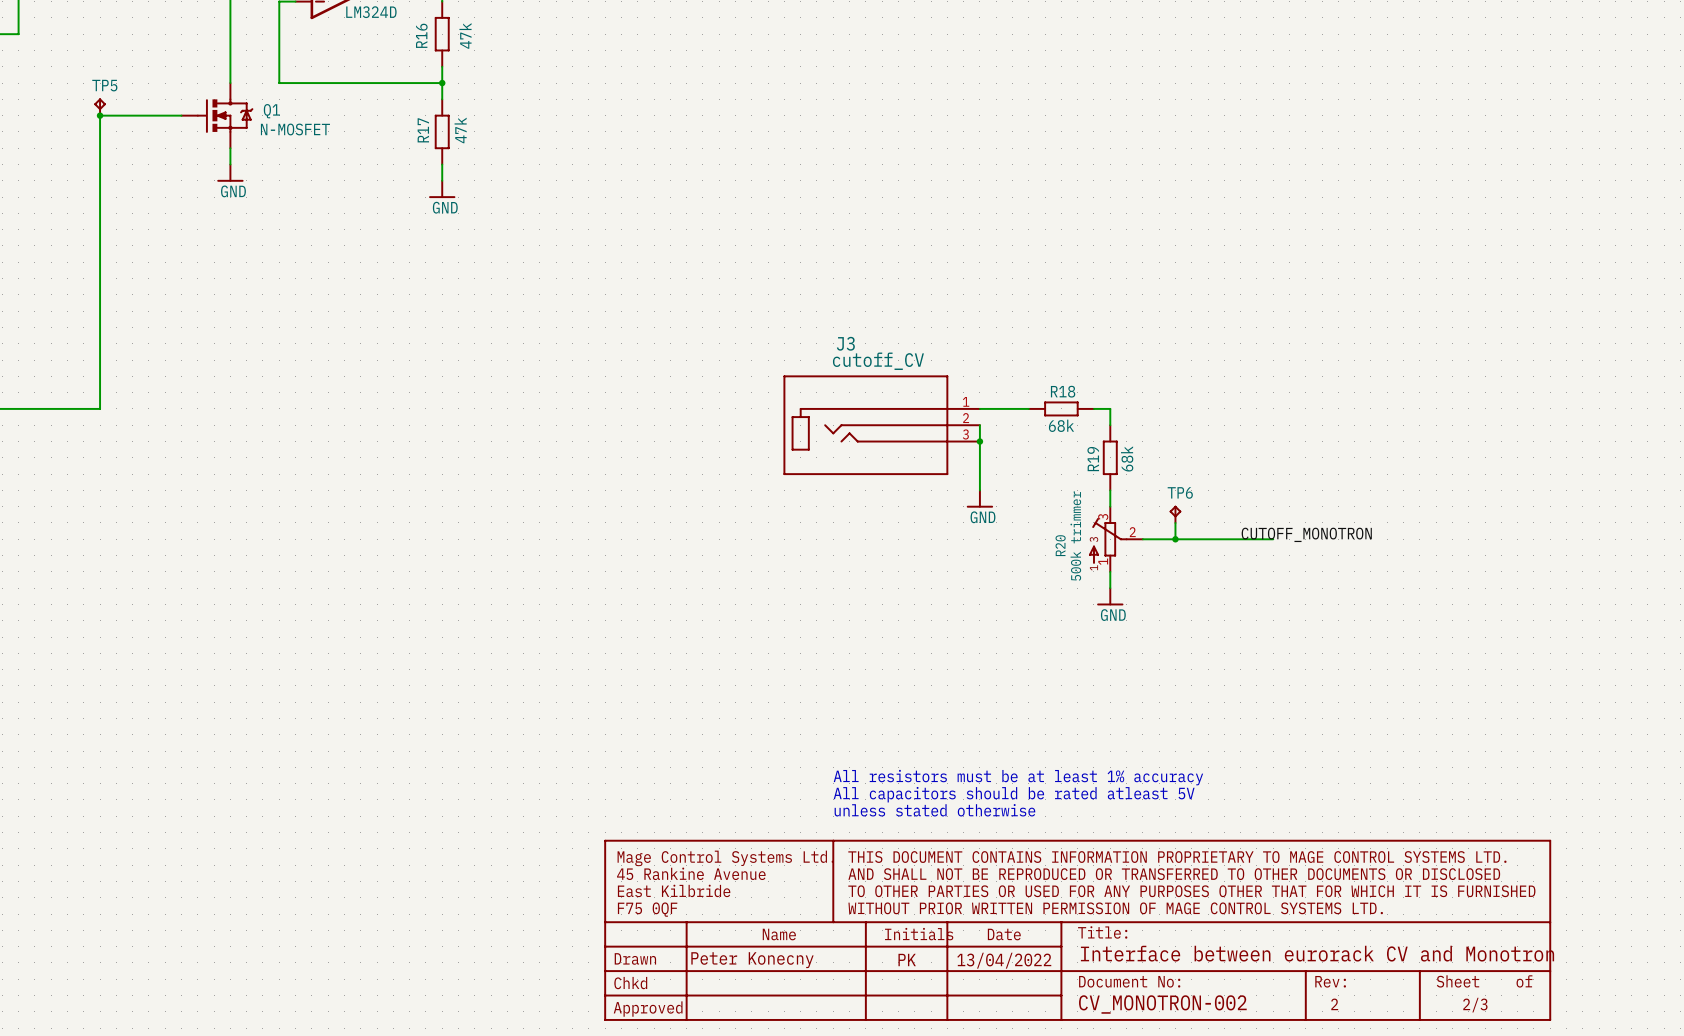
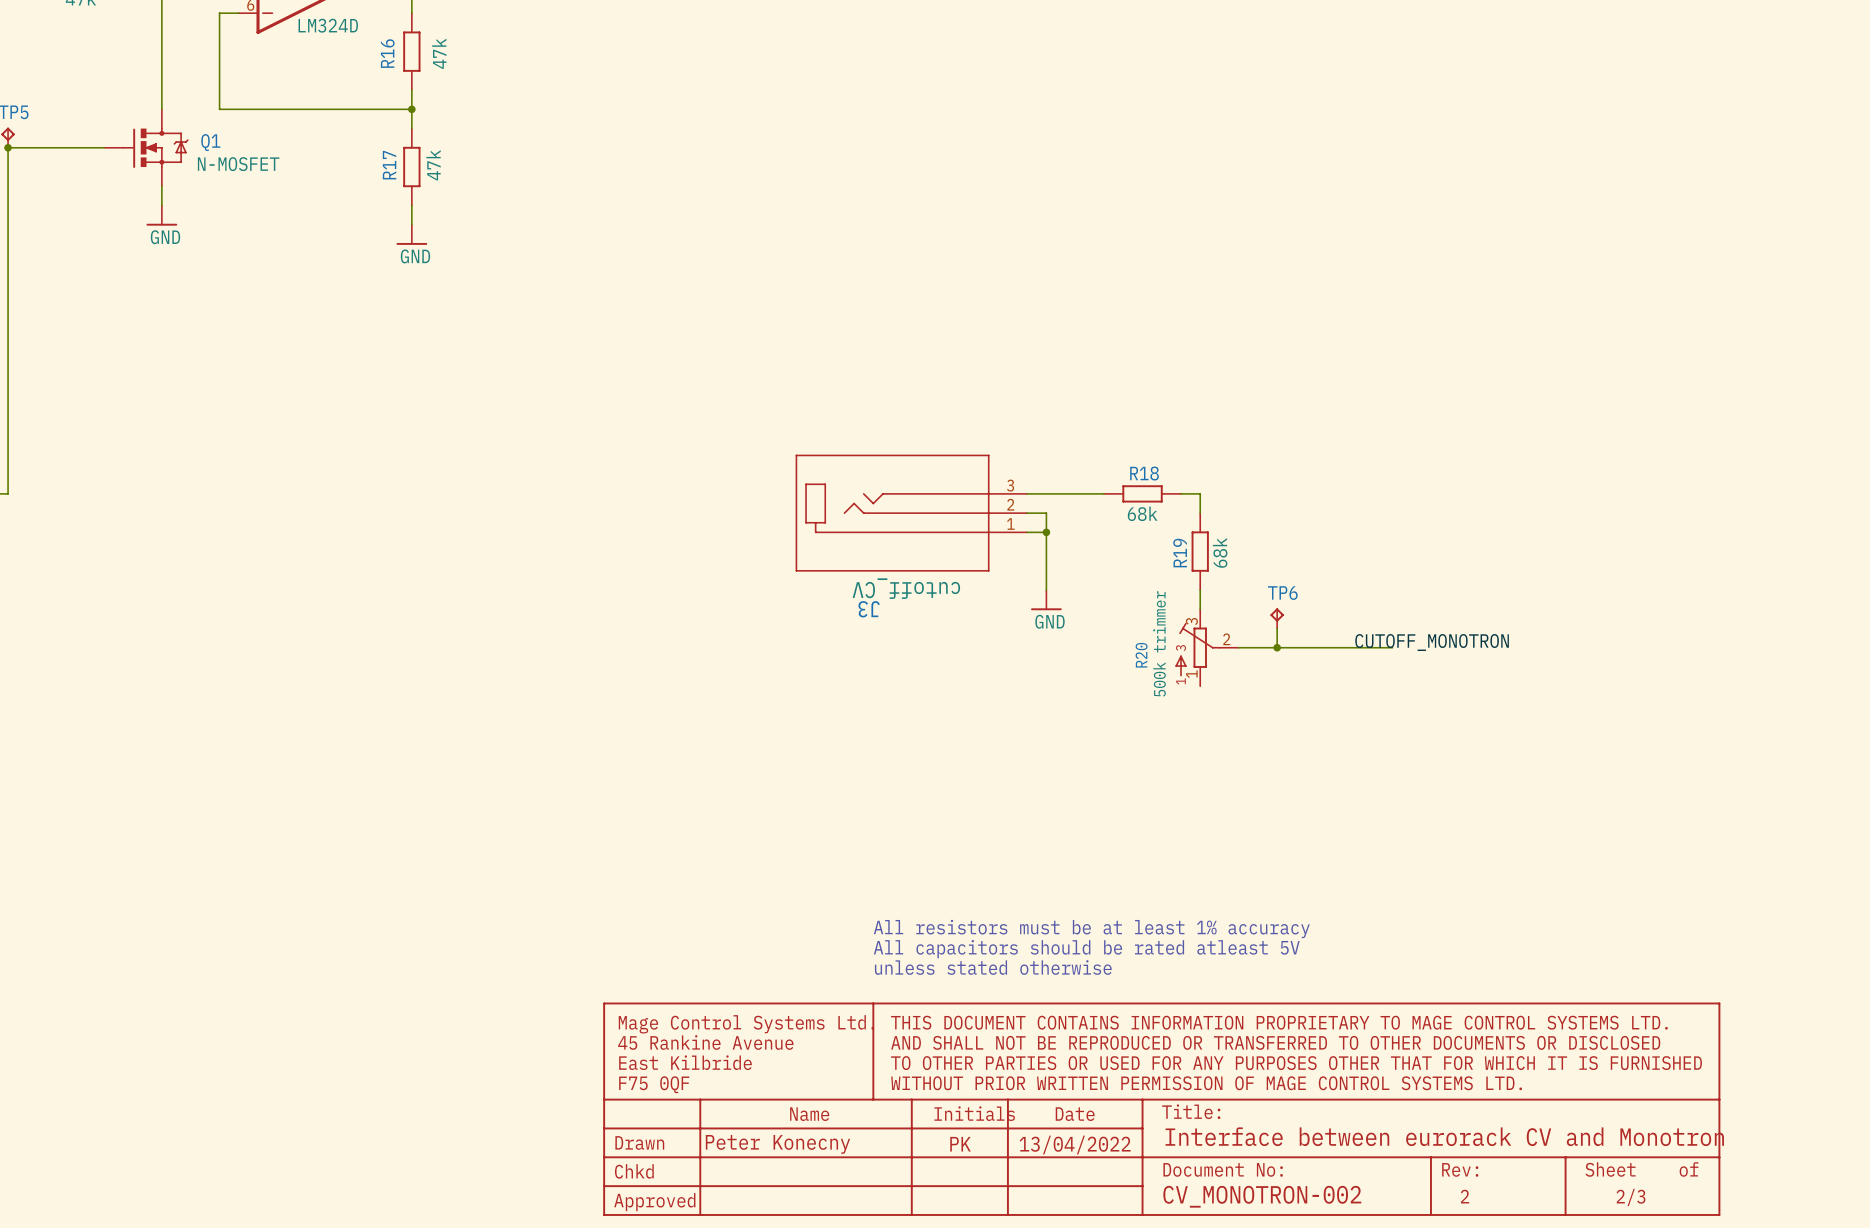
J3 flip: as is (865, 425) -> up-down (892, 513)
wire: (1110, 571) (1110, 588) -> none
power symbol: GND (1110, 596) -> none

